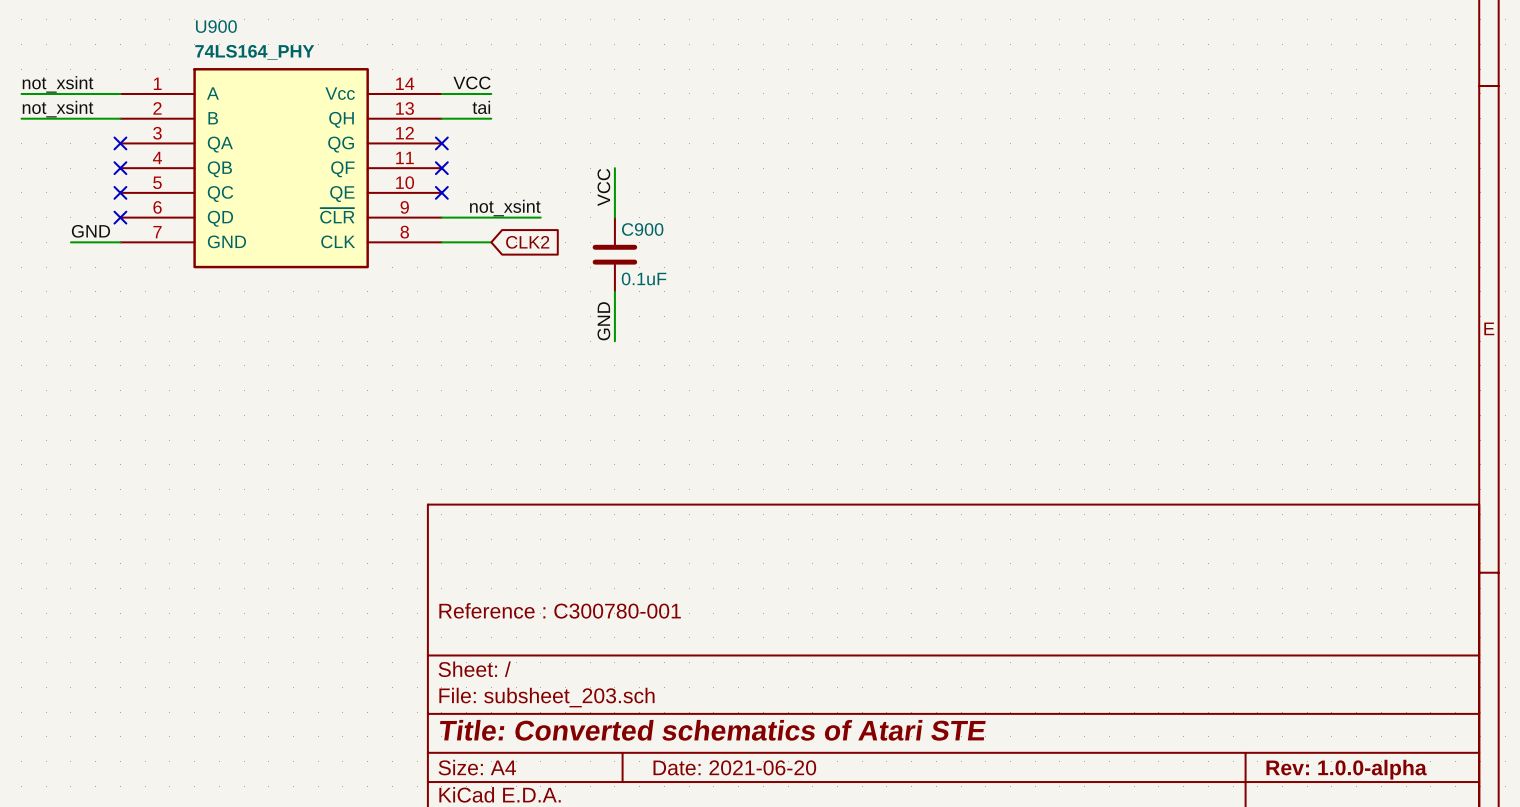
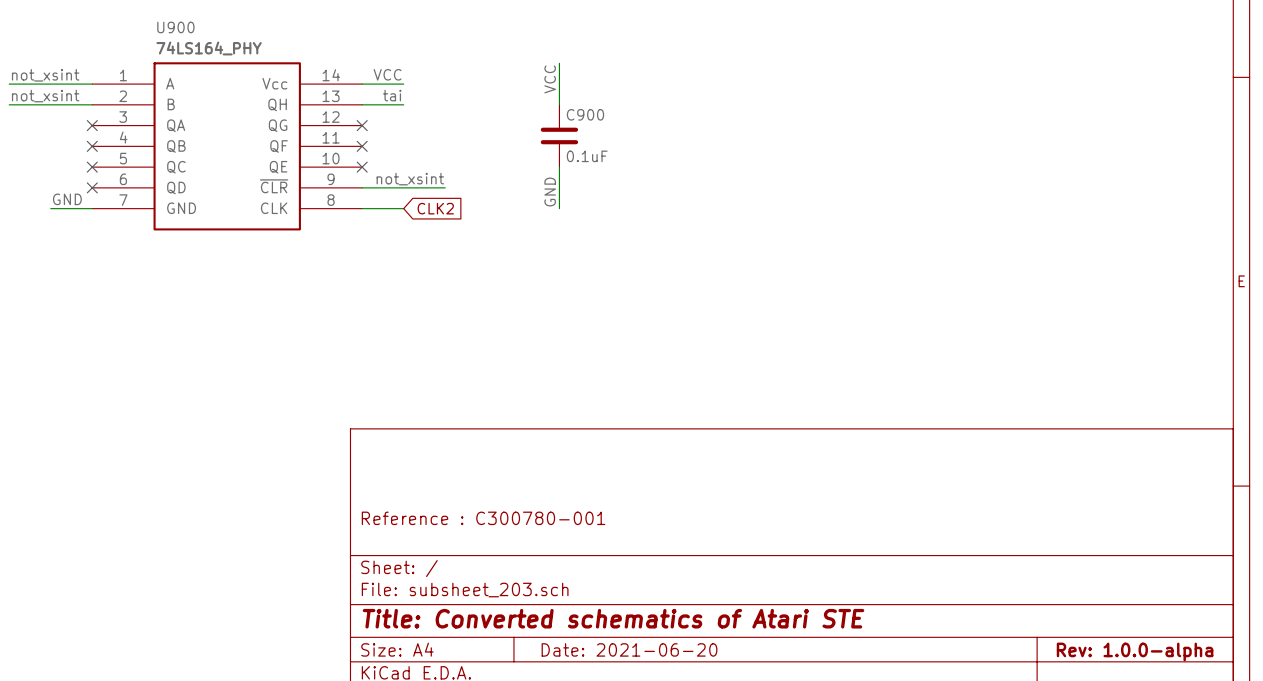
wire: (614, 168) (614, 217) -> (559, 63) (559, 104)
label position: VCC (603, 187) -> VCC (550, 79)
C900 position: (614, 254) -> (559, 135)
wire: (614, 291) (614, 341) -> (559, 167) (559, 208)
label position: GND (603, 321) -> GND (550, 192)

